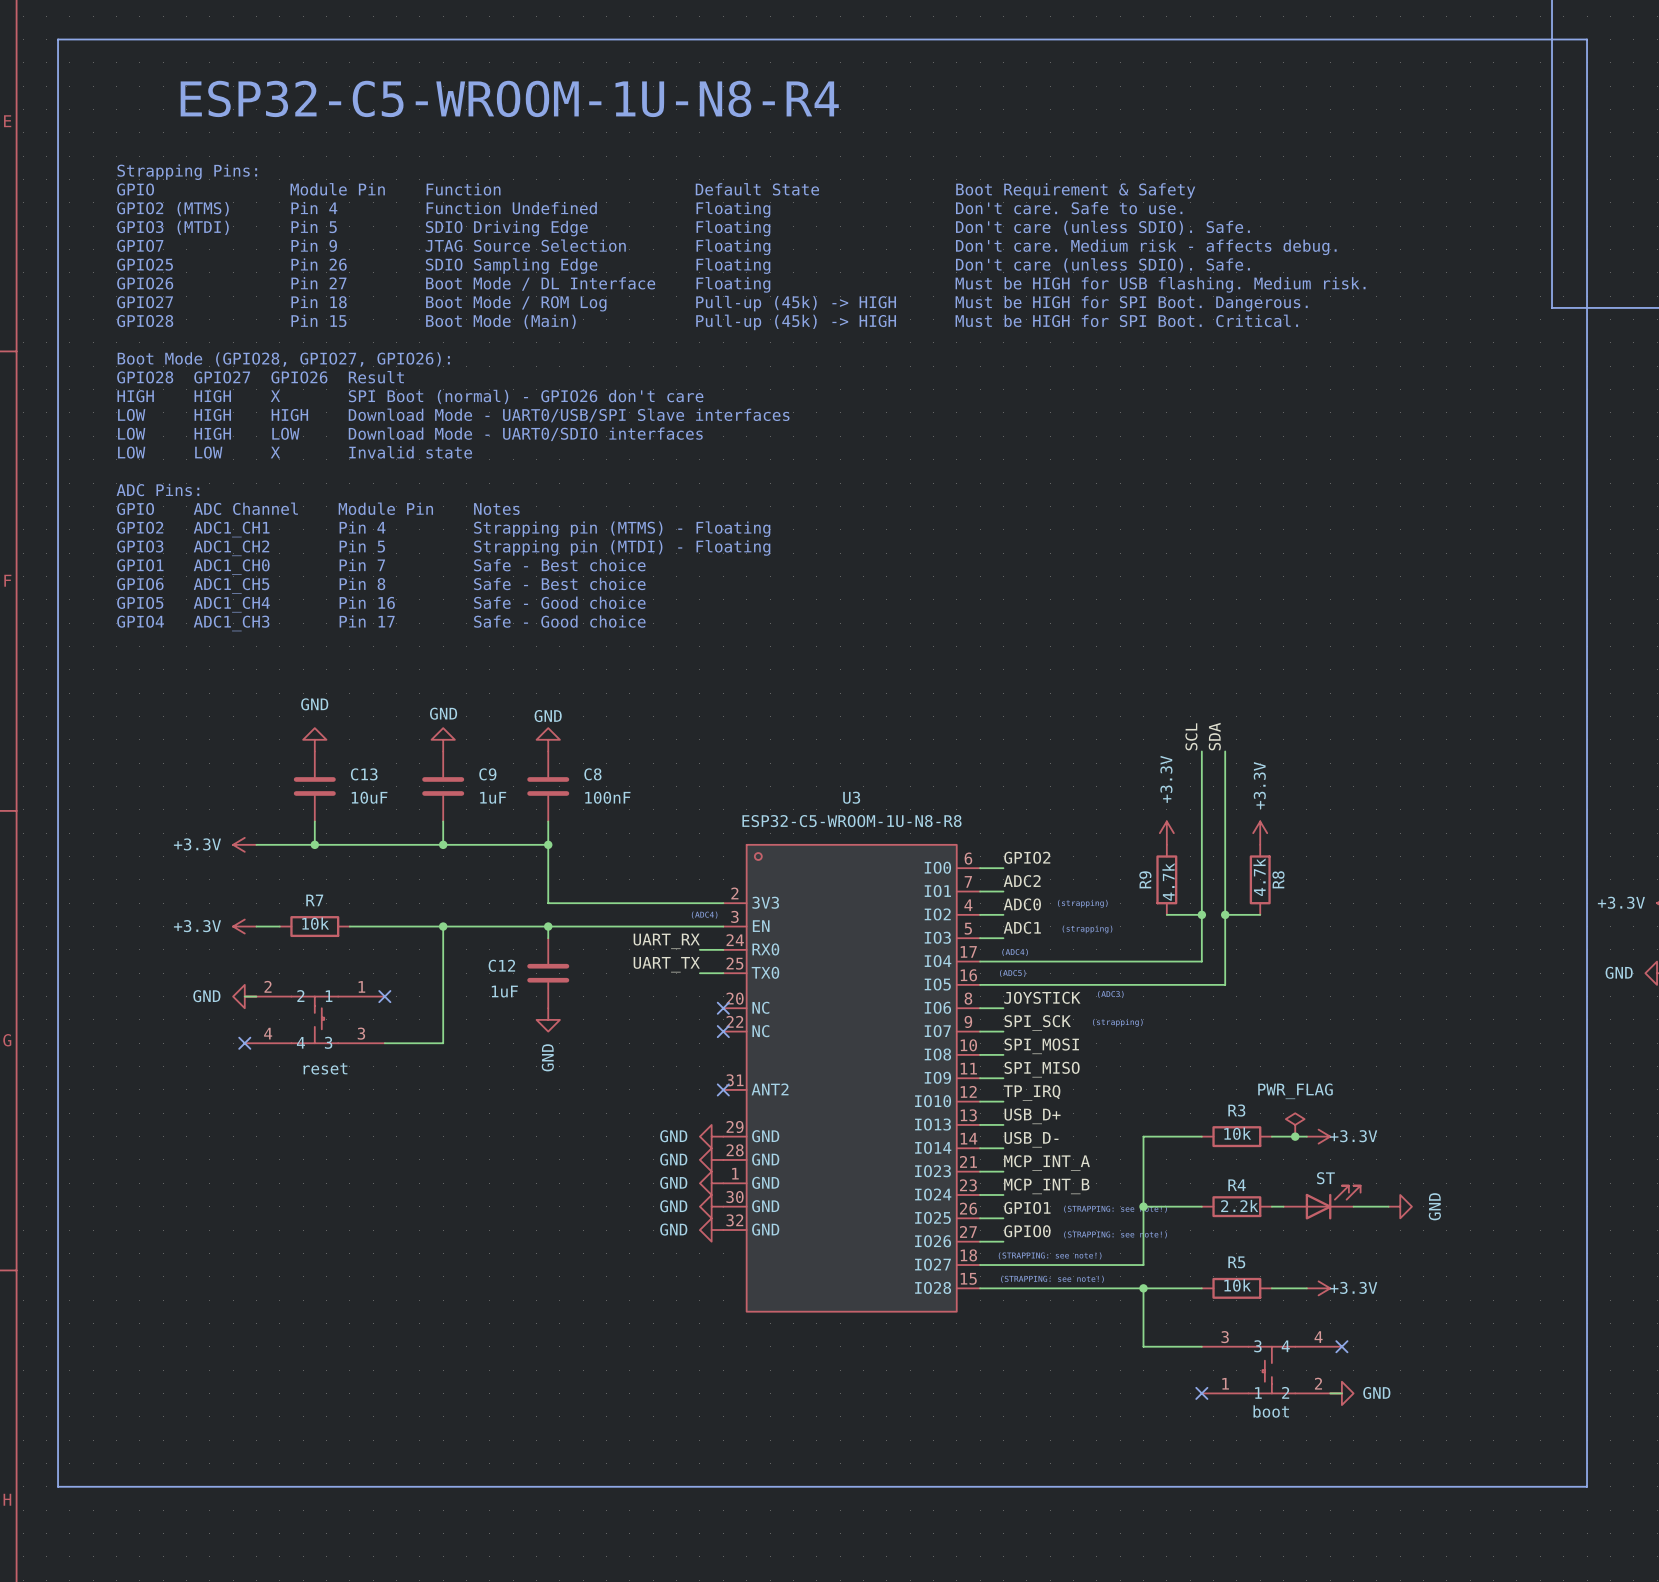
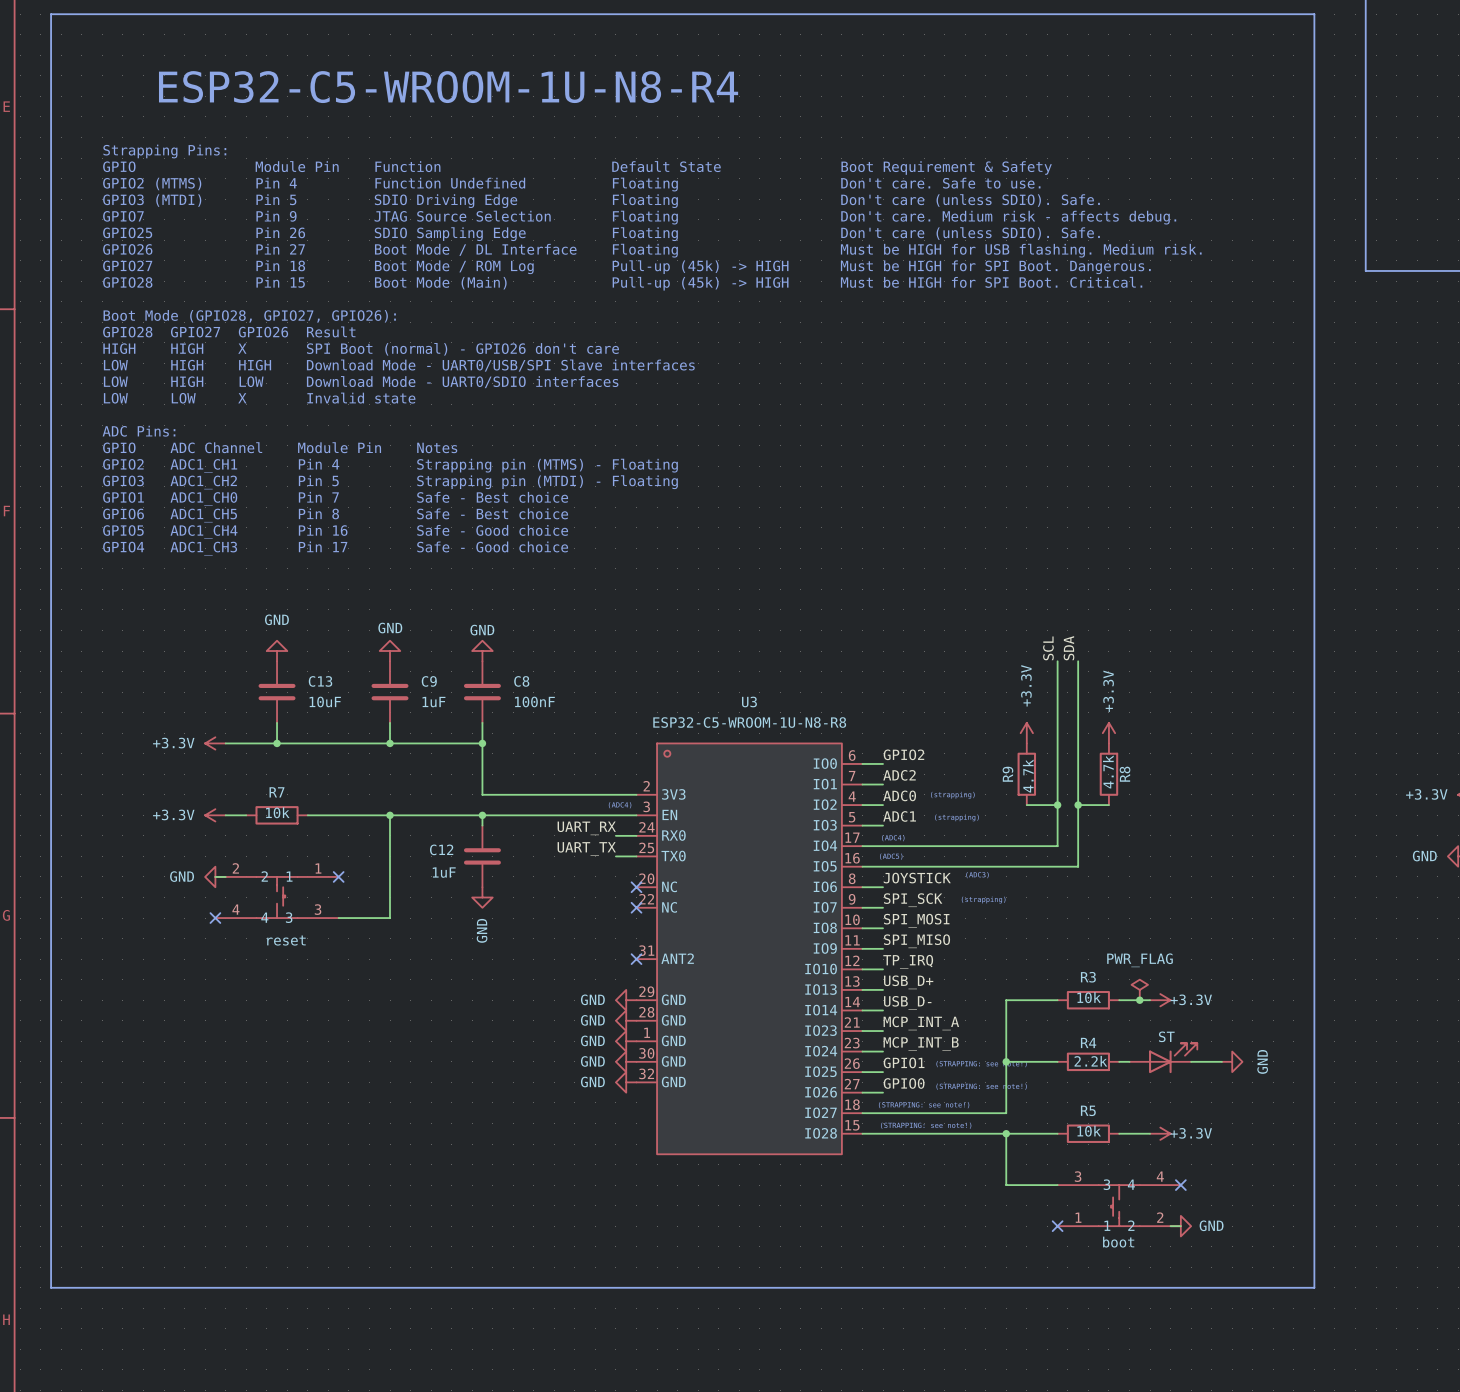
line: (58, 39) (1587, 39) (1587, 1486) (58, 1486) (58, 1463) -> (51, 34) (51, 14) (1314, 14) (1314, 1287) (51, 1287)

